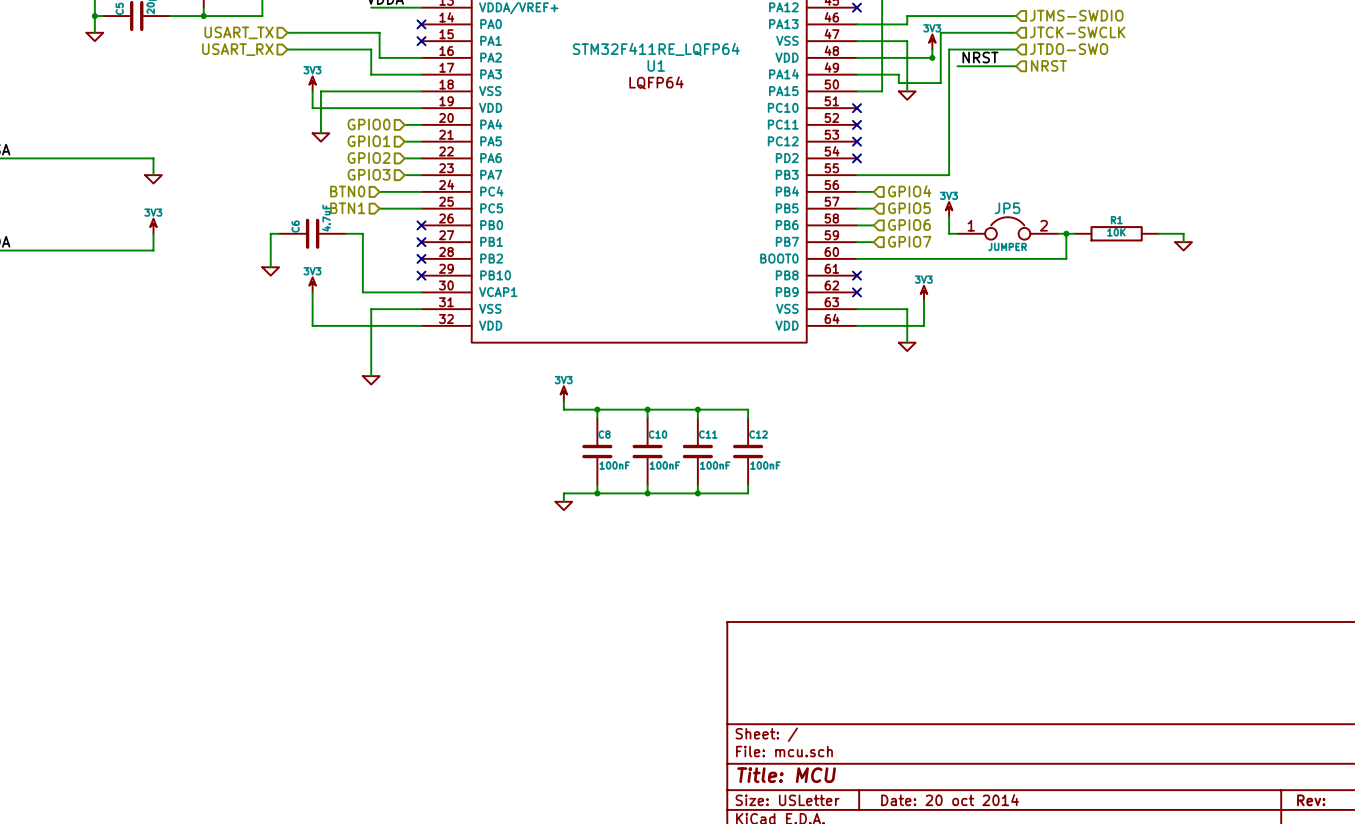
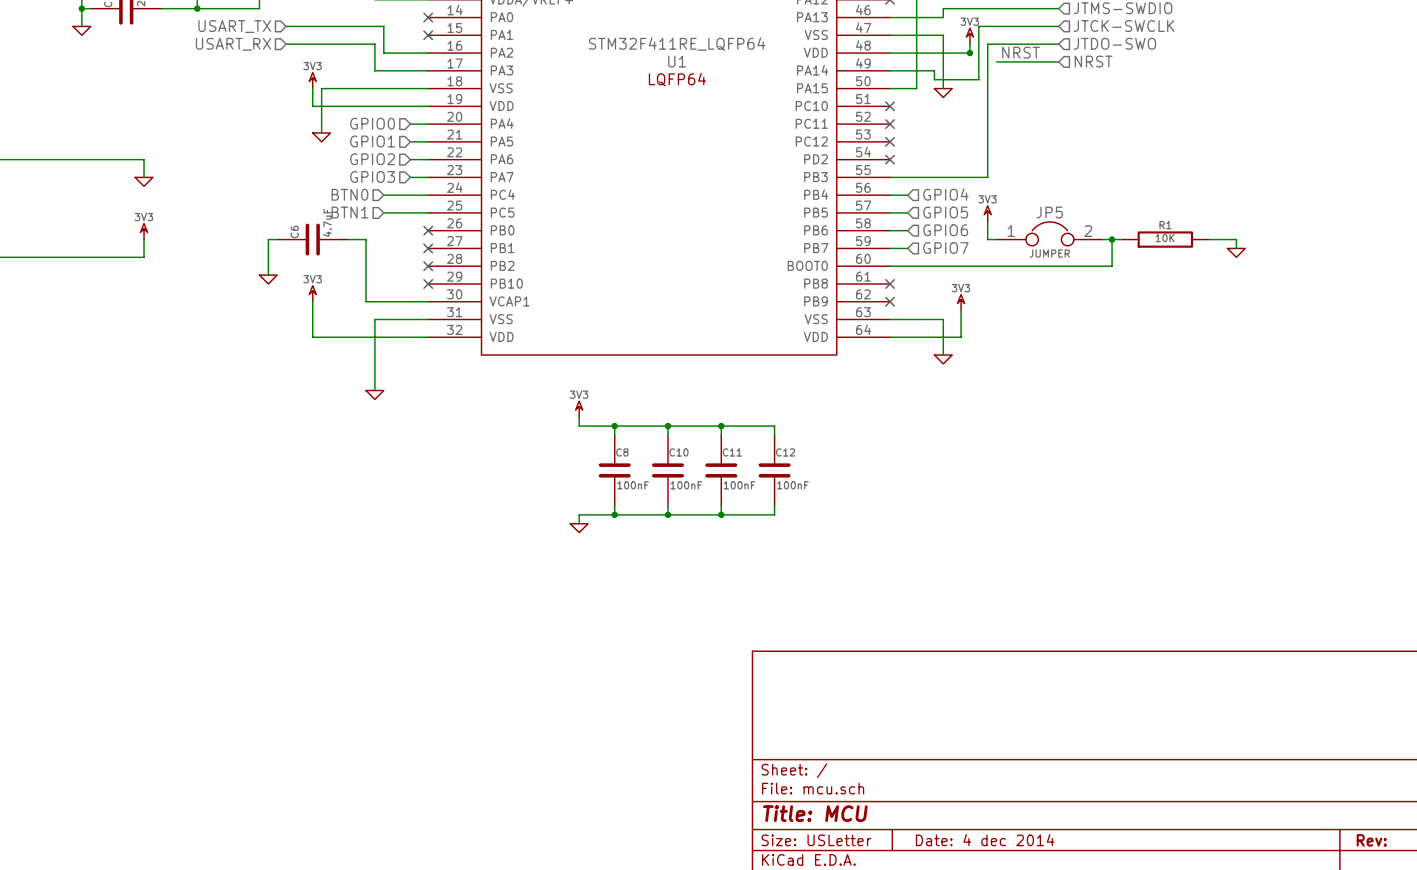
title block: Date: 20 oct 2014 (950, 800) -> Date: 4 dec 2014 (985, 840)

